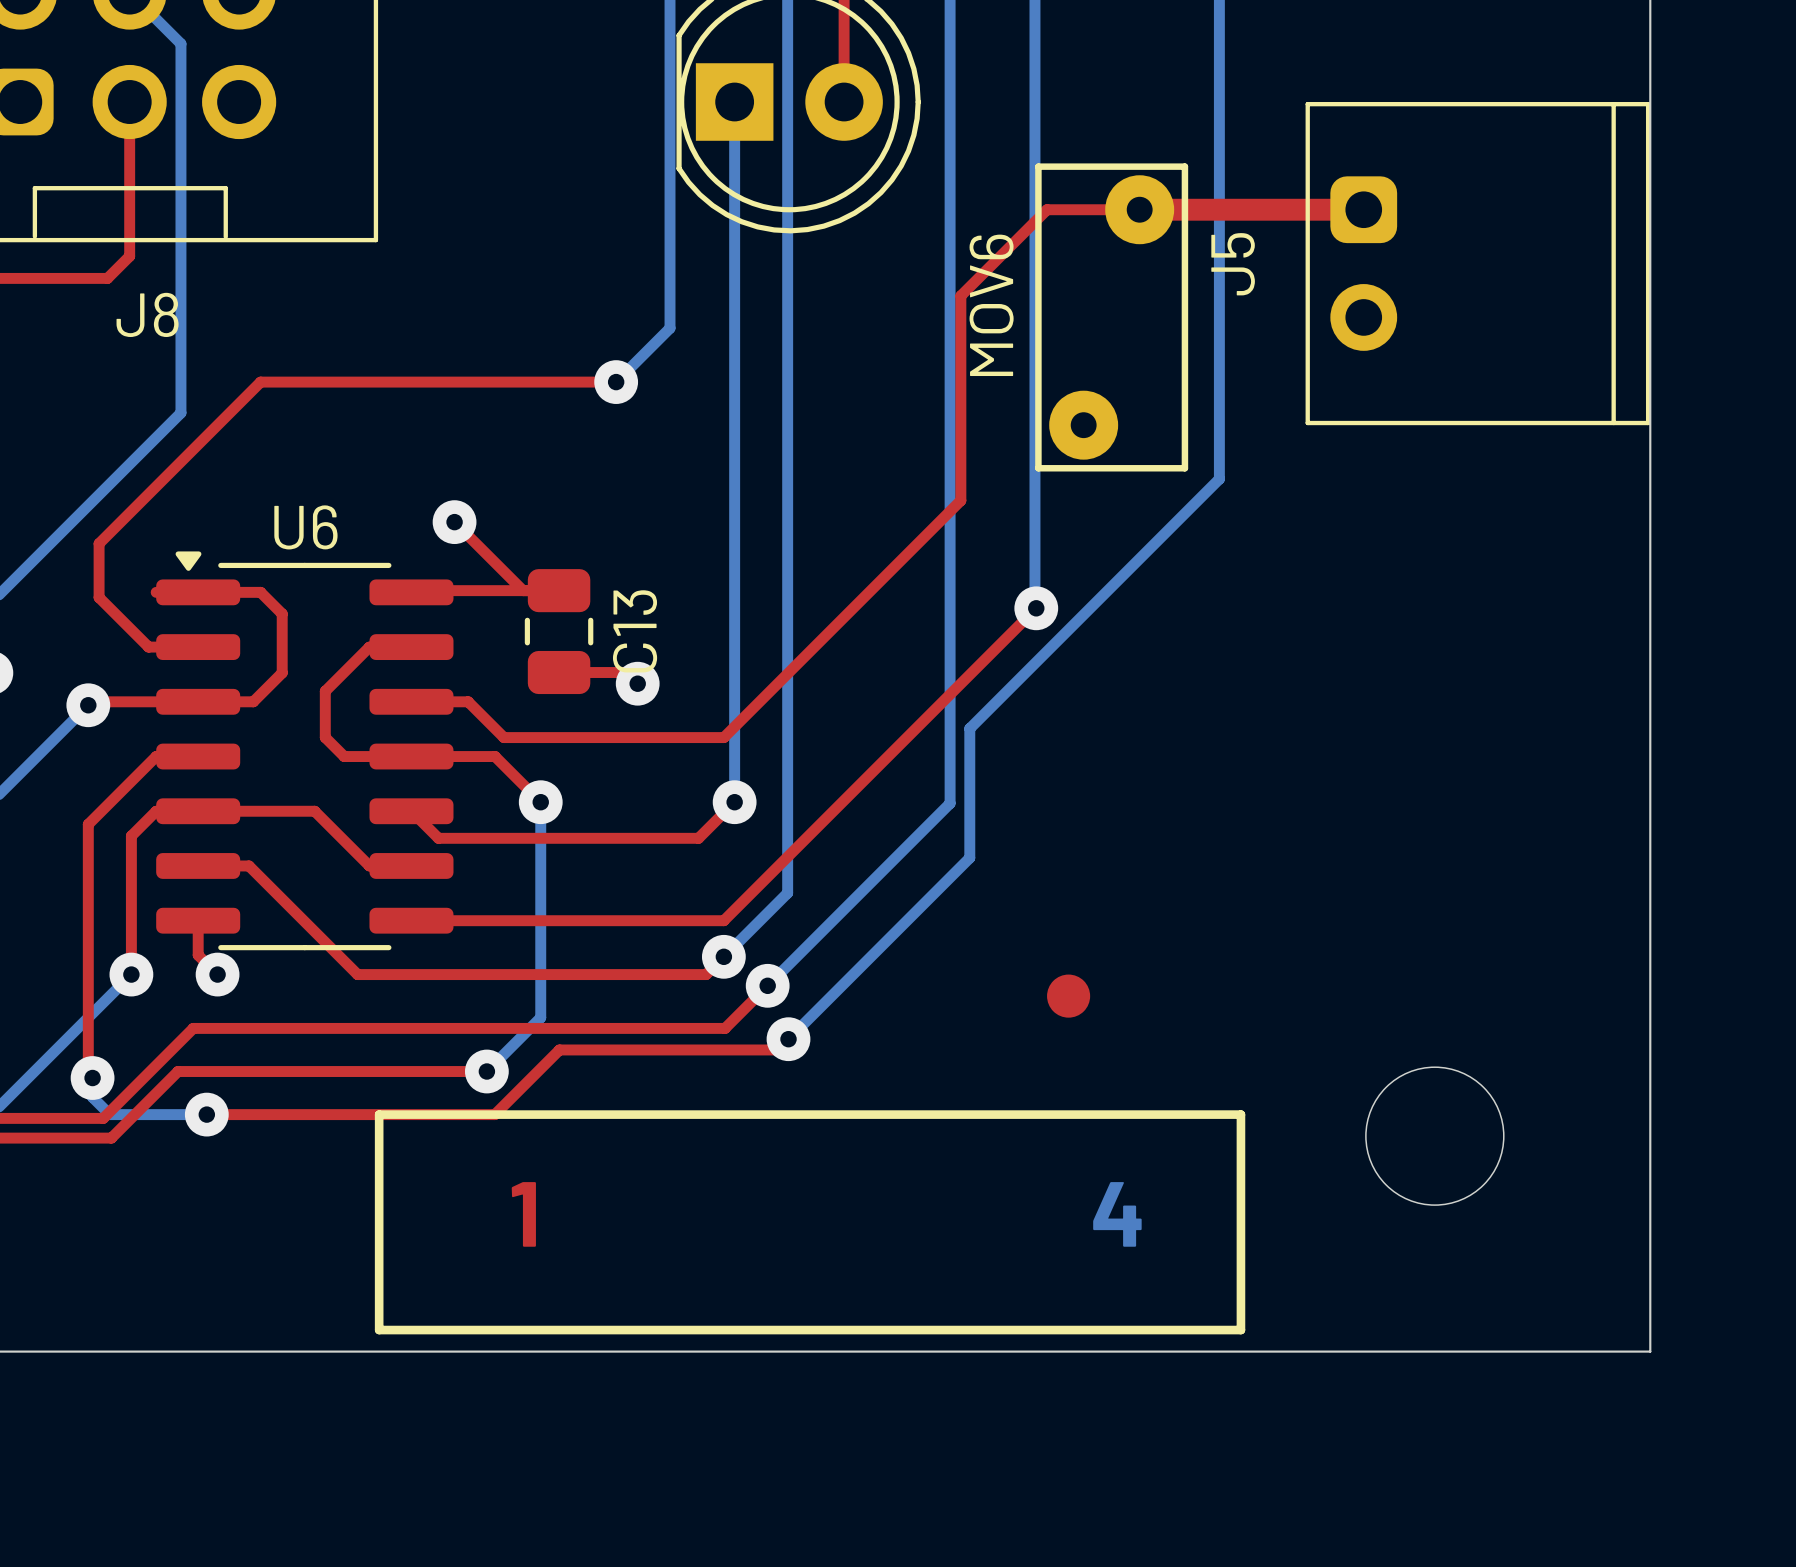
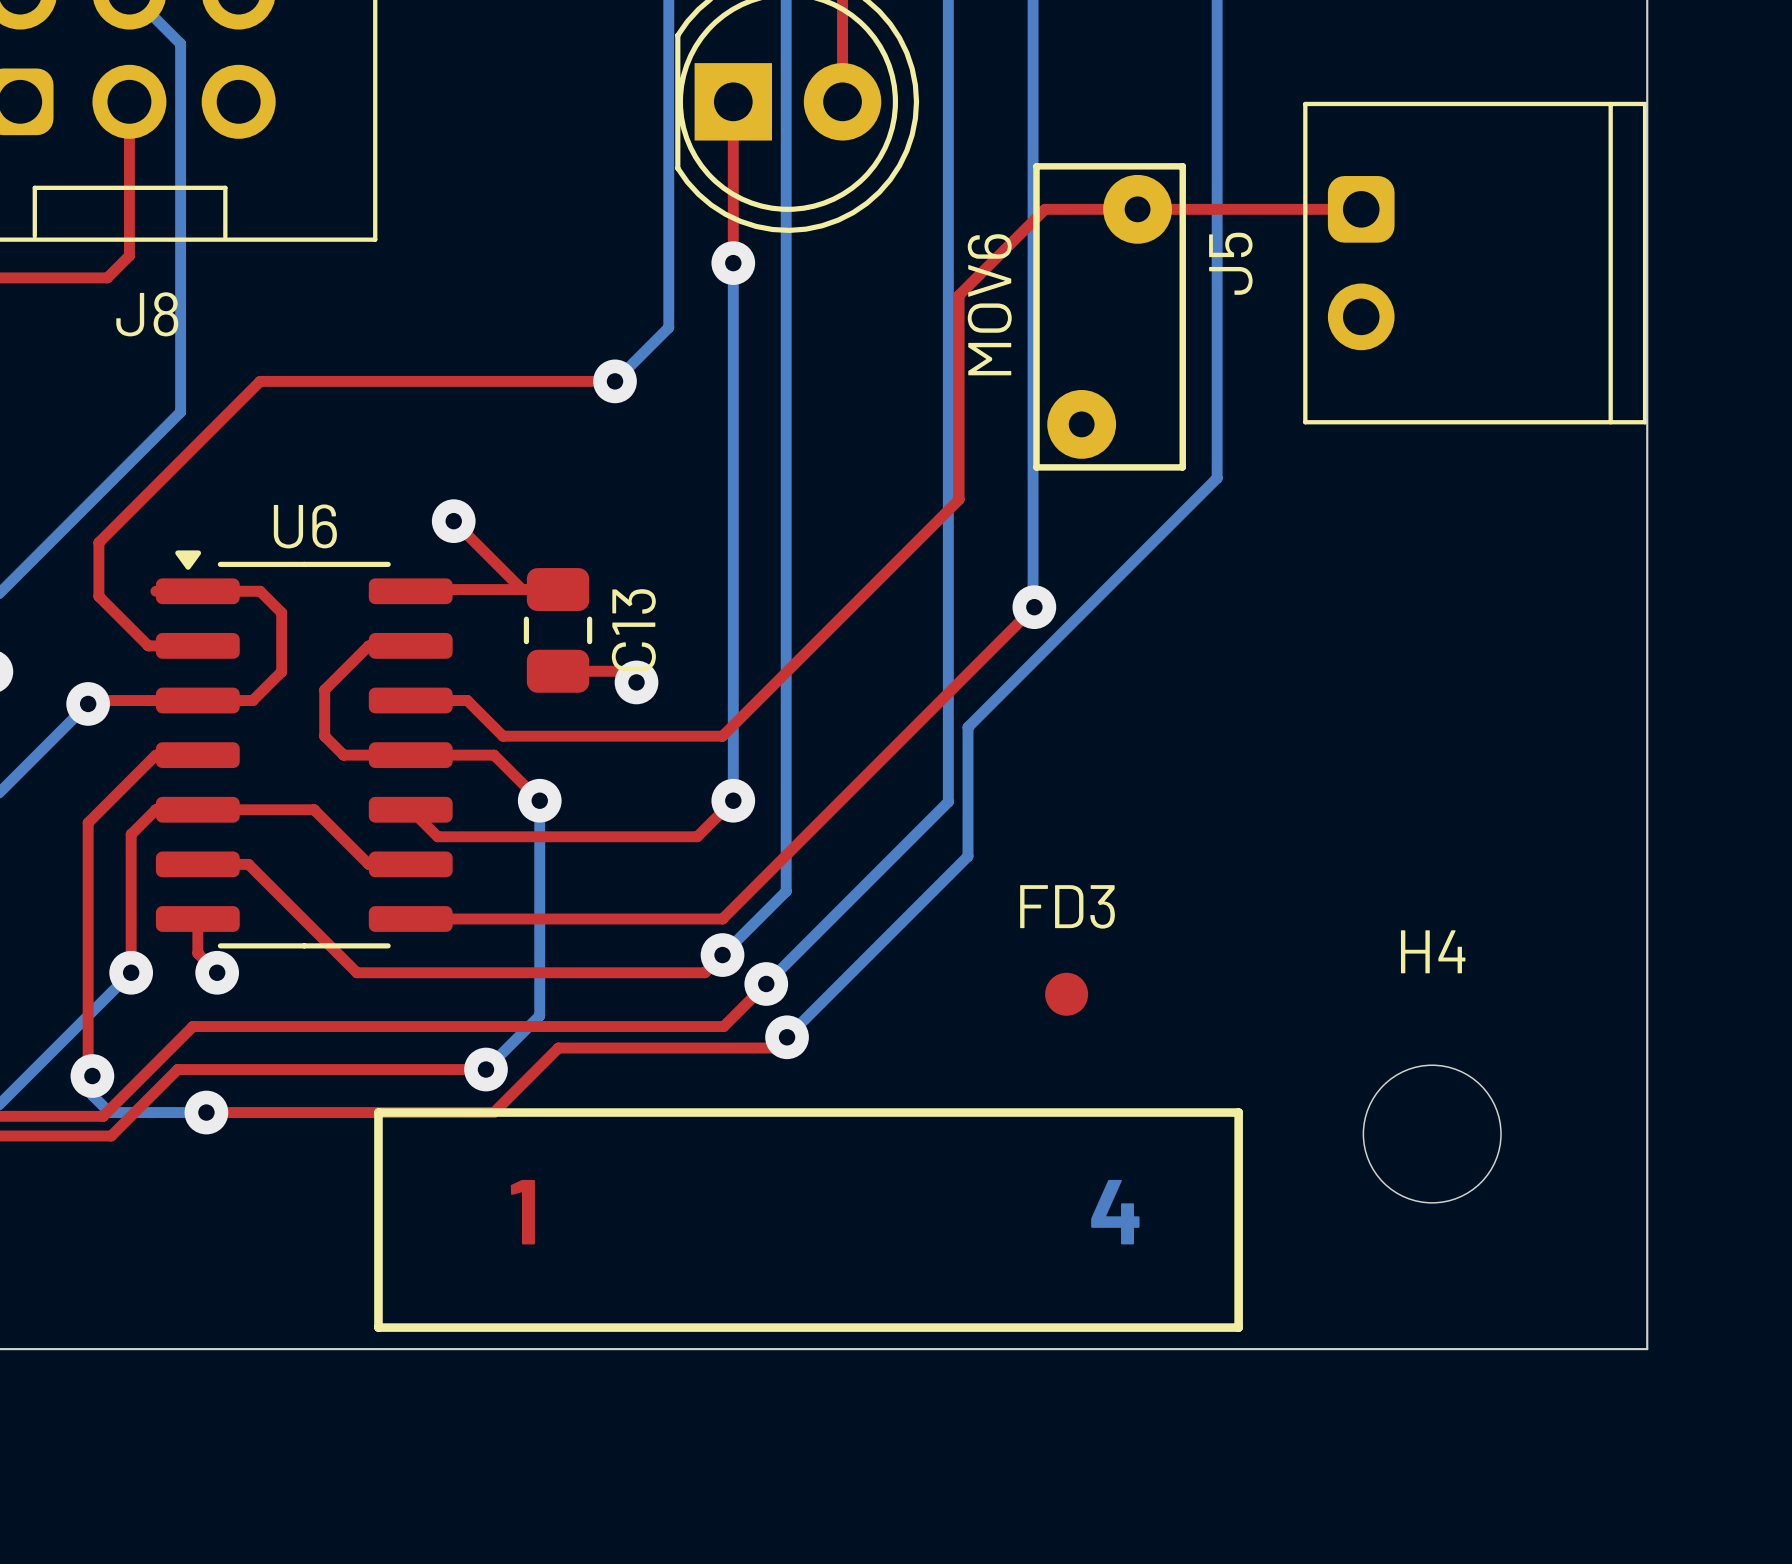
top track: none -> (733, 101) (733, 263)
bottom track: (734, 102) (734, 263) -> none
top track width: thick (1139, 209) (1370, 209) -> thin (1137, 209) (1367, 209)
via: none -> (733, 263)
FD3 name: none -> FD3 (1067, 906)
H4 name: none -> H4 (1433, 951)

